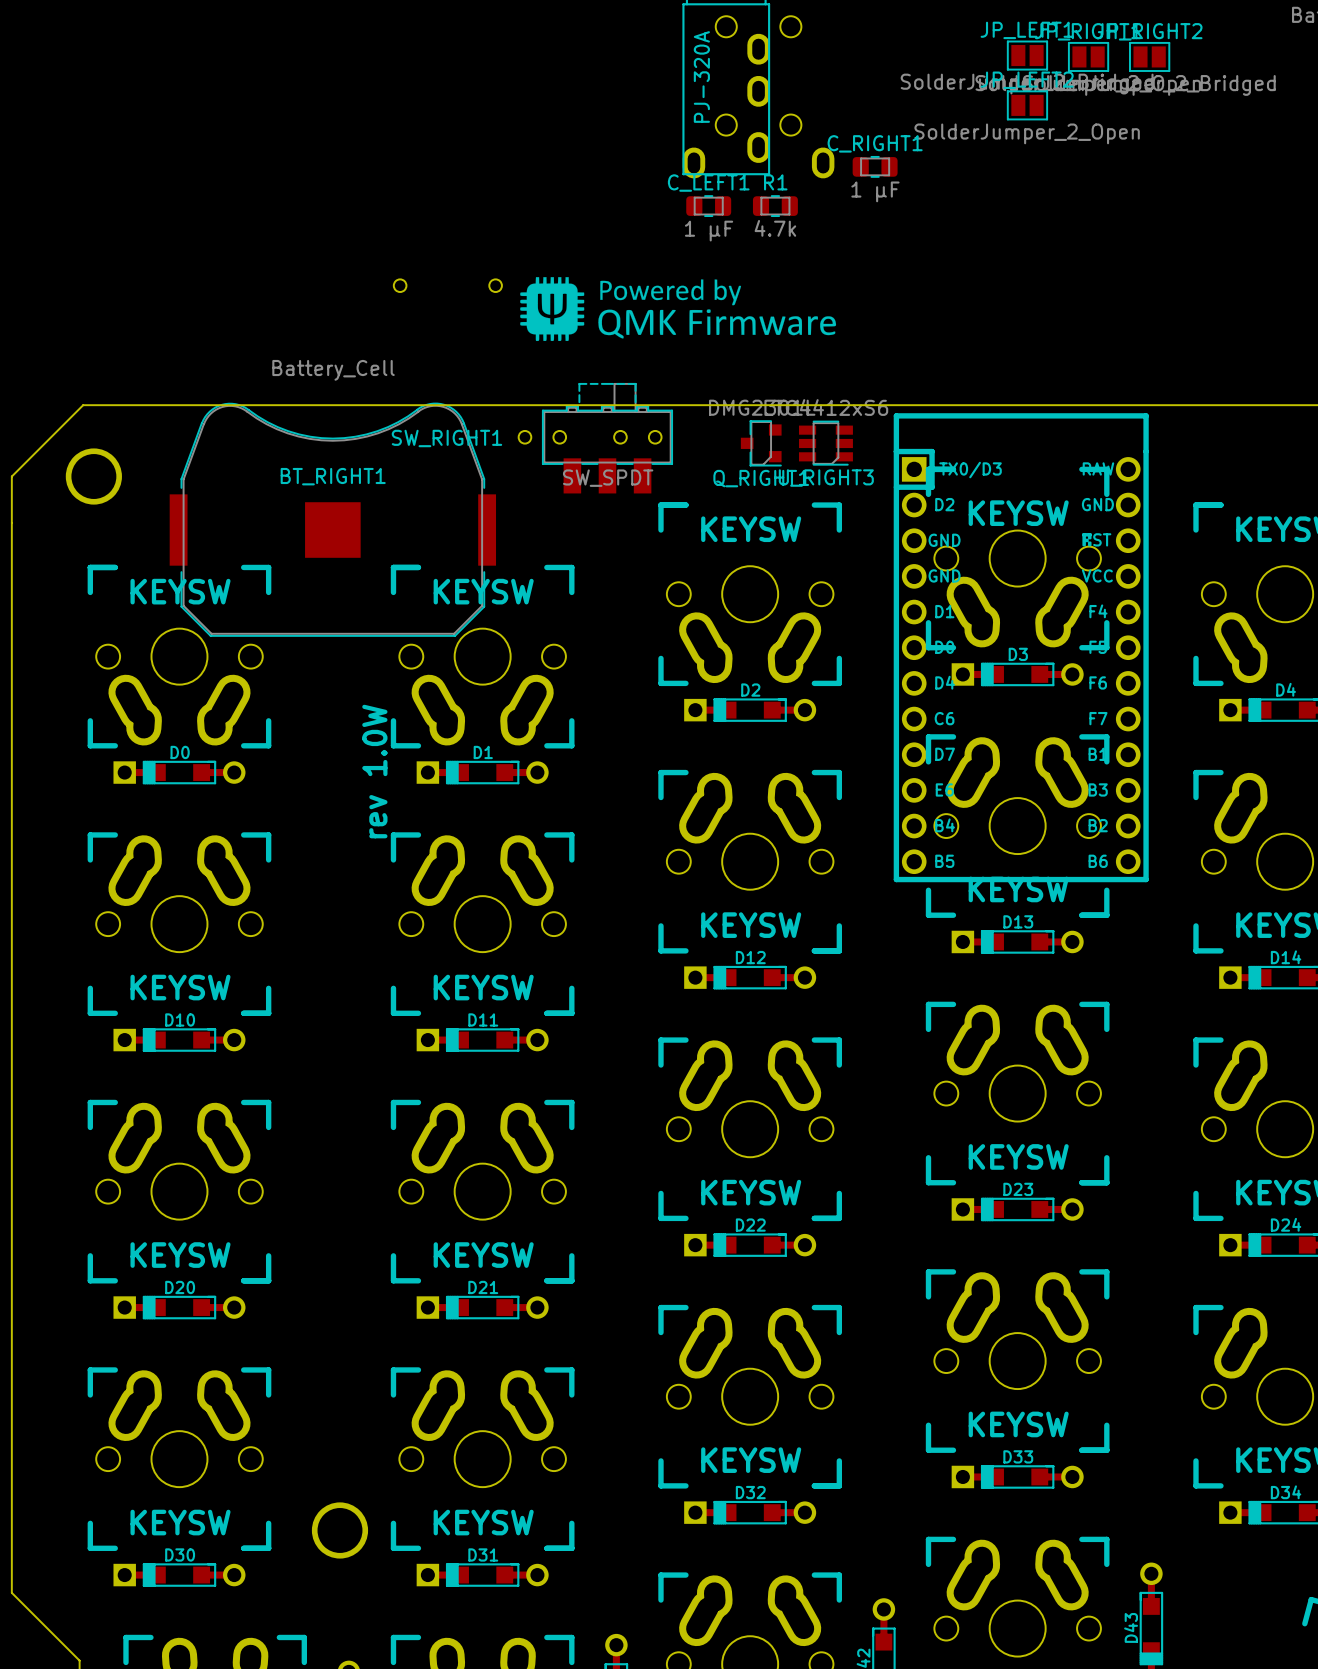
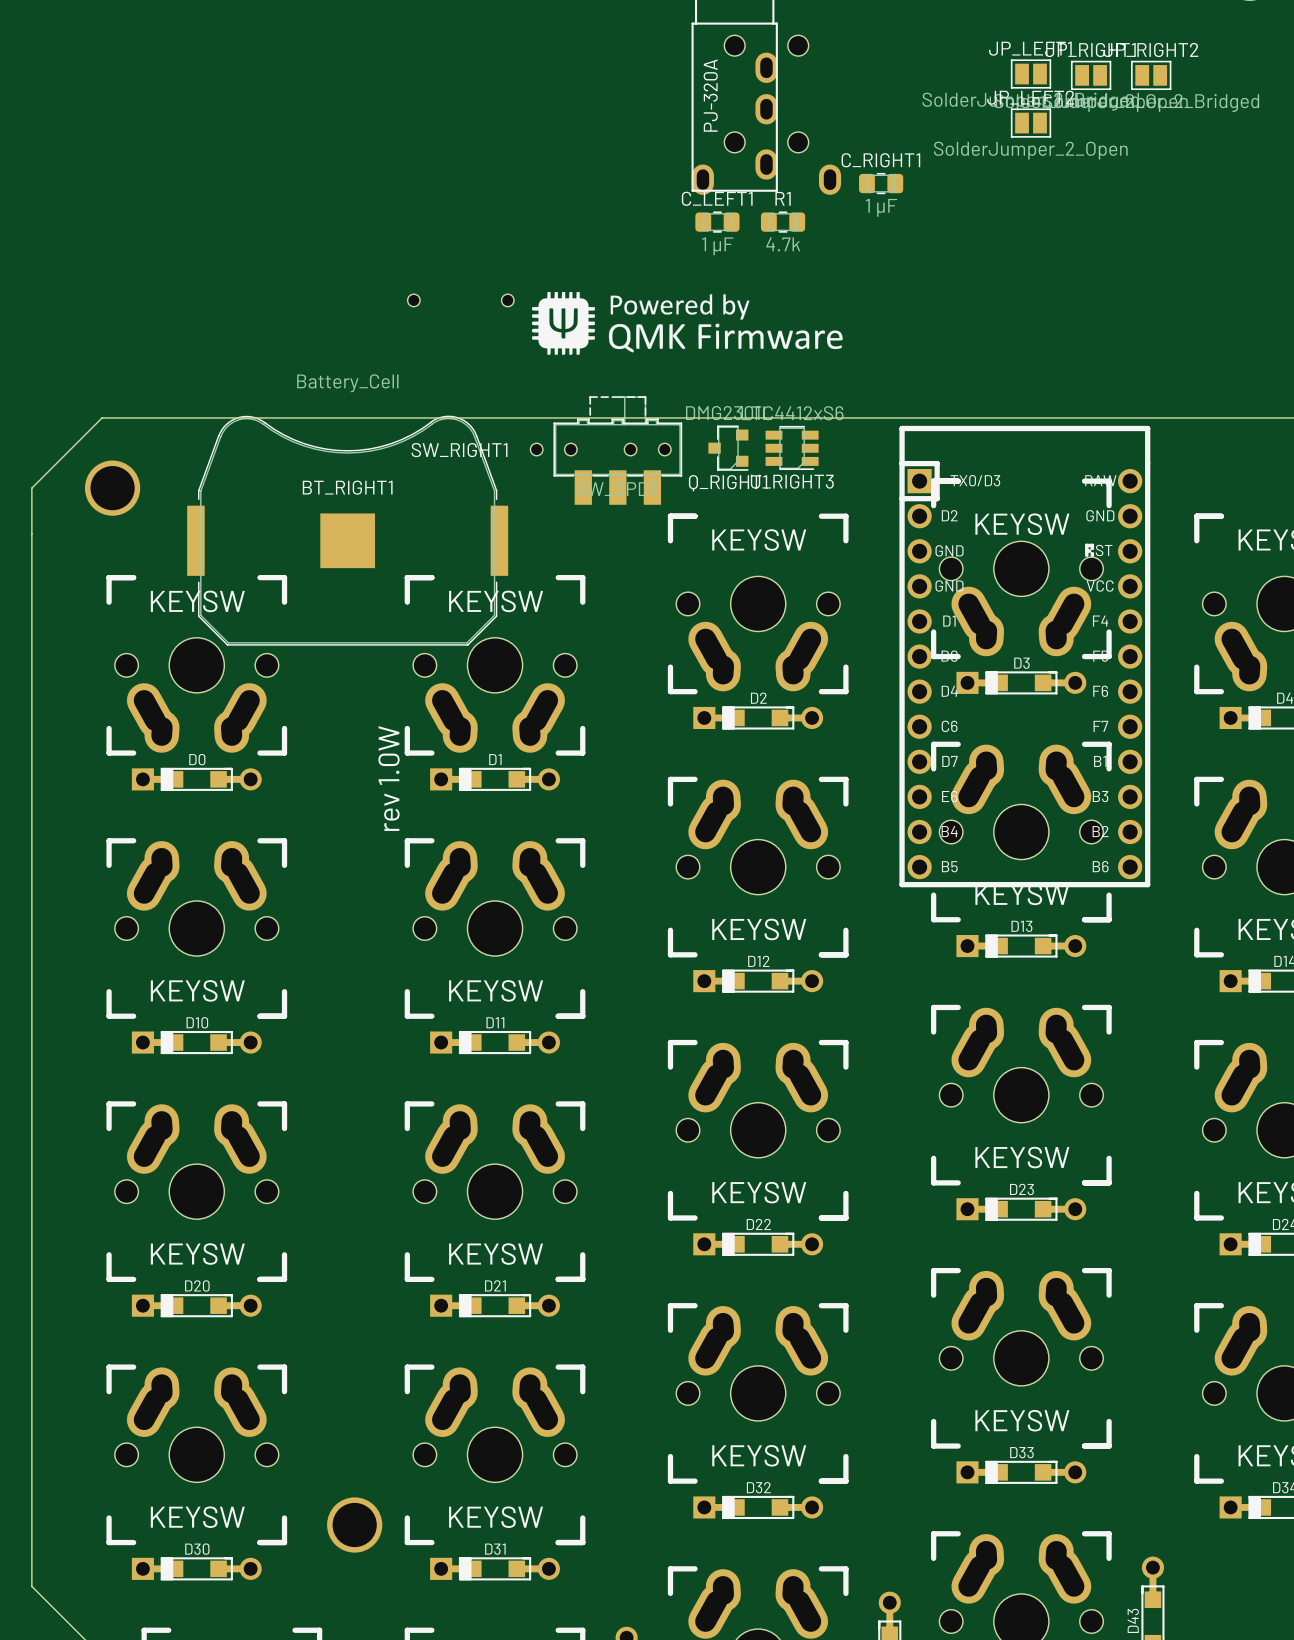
Q_RIGHT1 position: (761, 443) -> (728, 448)
U_RIGHT3 position: (825, 443) -> (792, 447)

